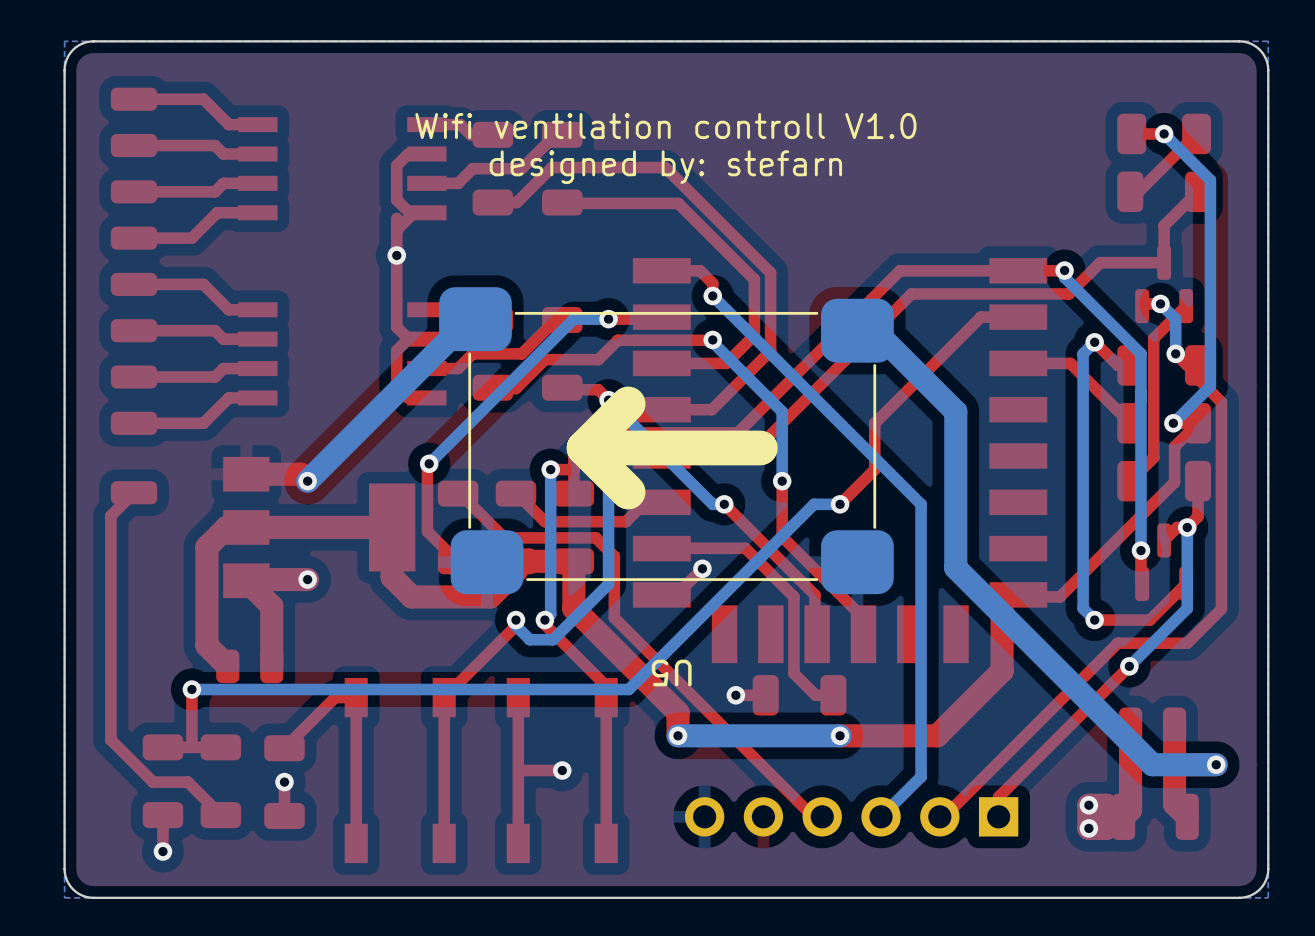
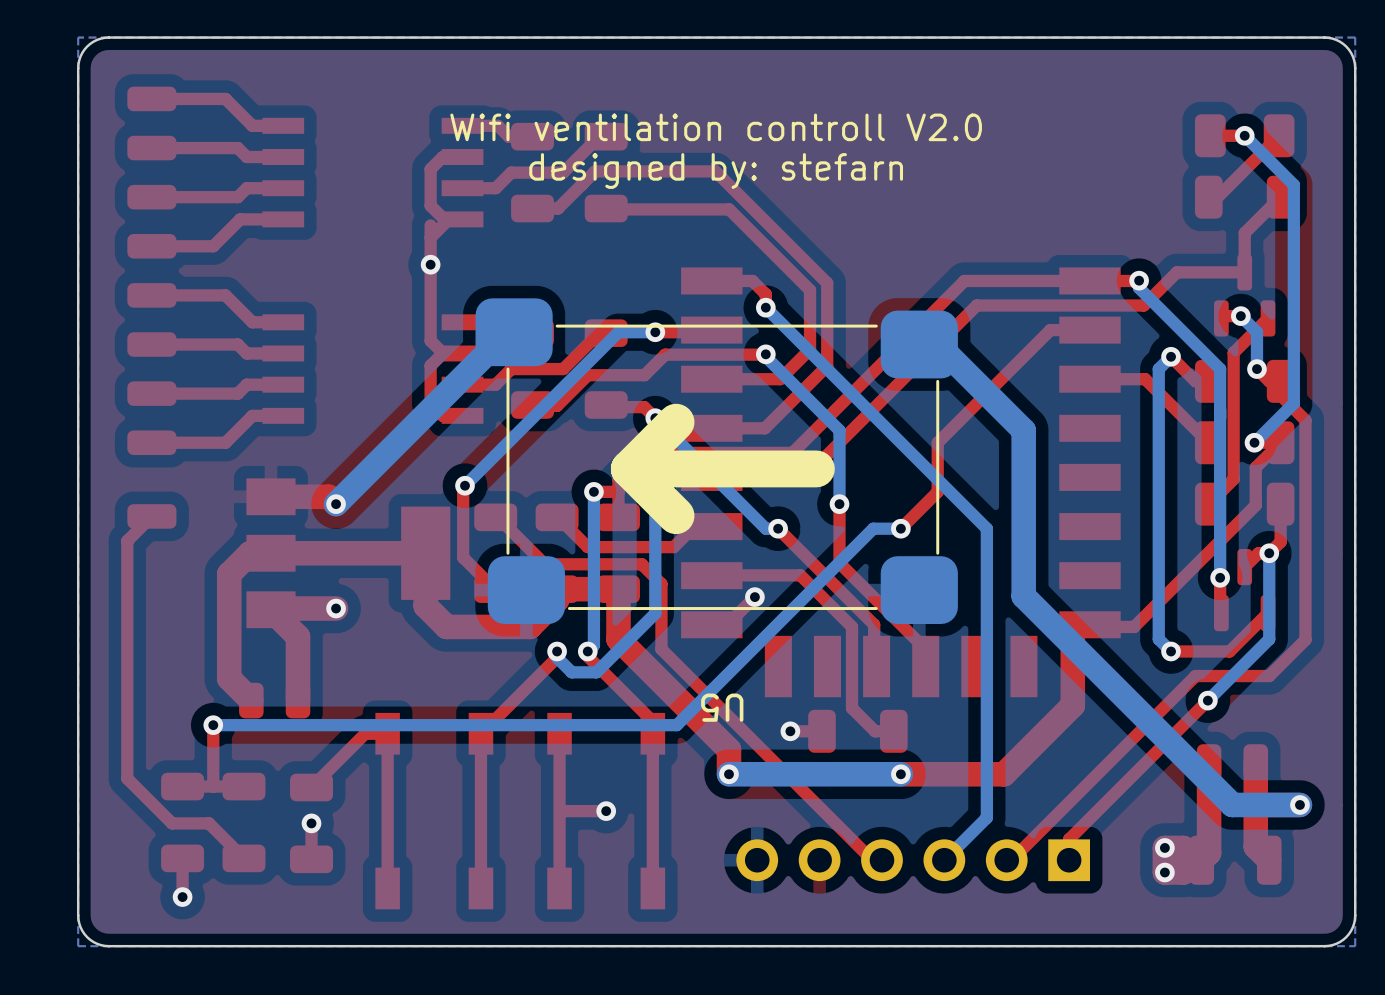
text: Wifi ventilation controll V1.0 (665, 126) -> Wifi ventilation controll V2.0 (716, 127)

